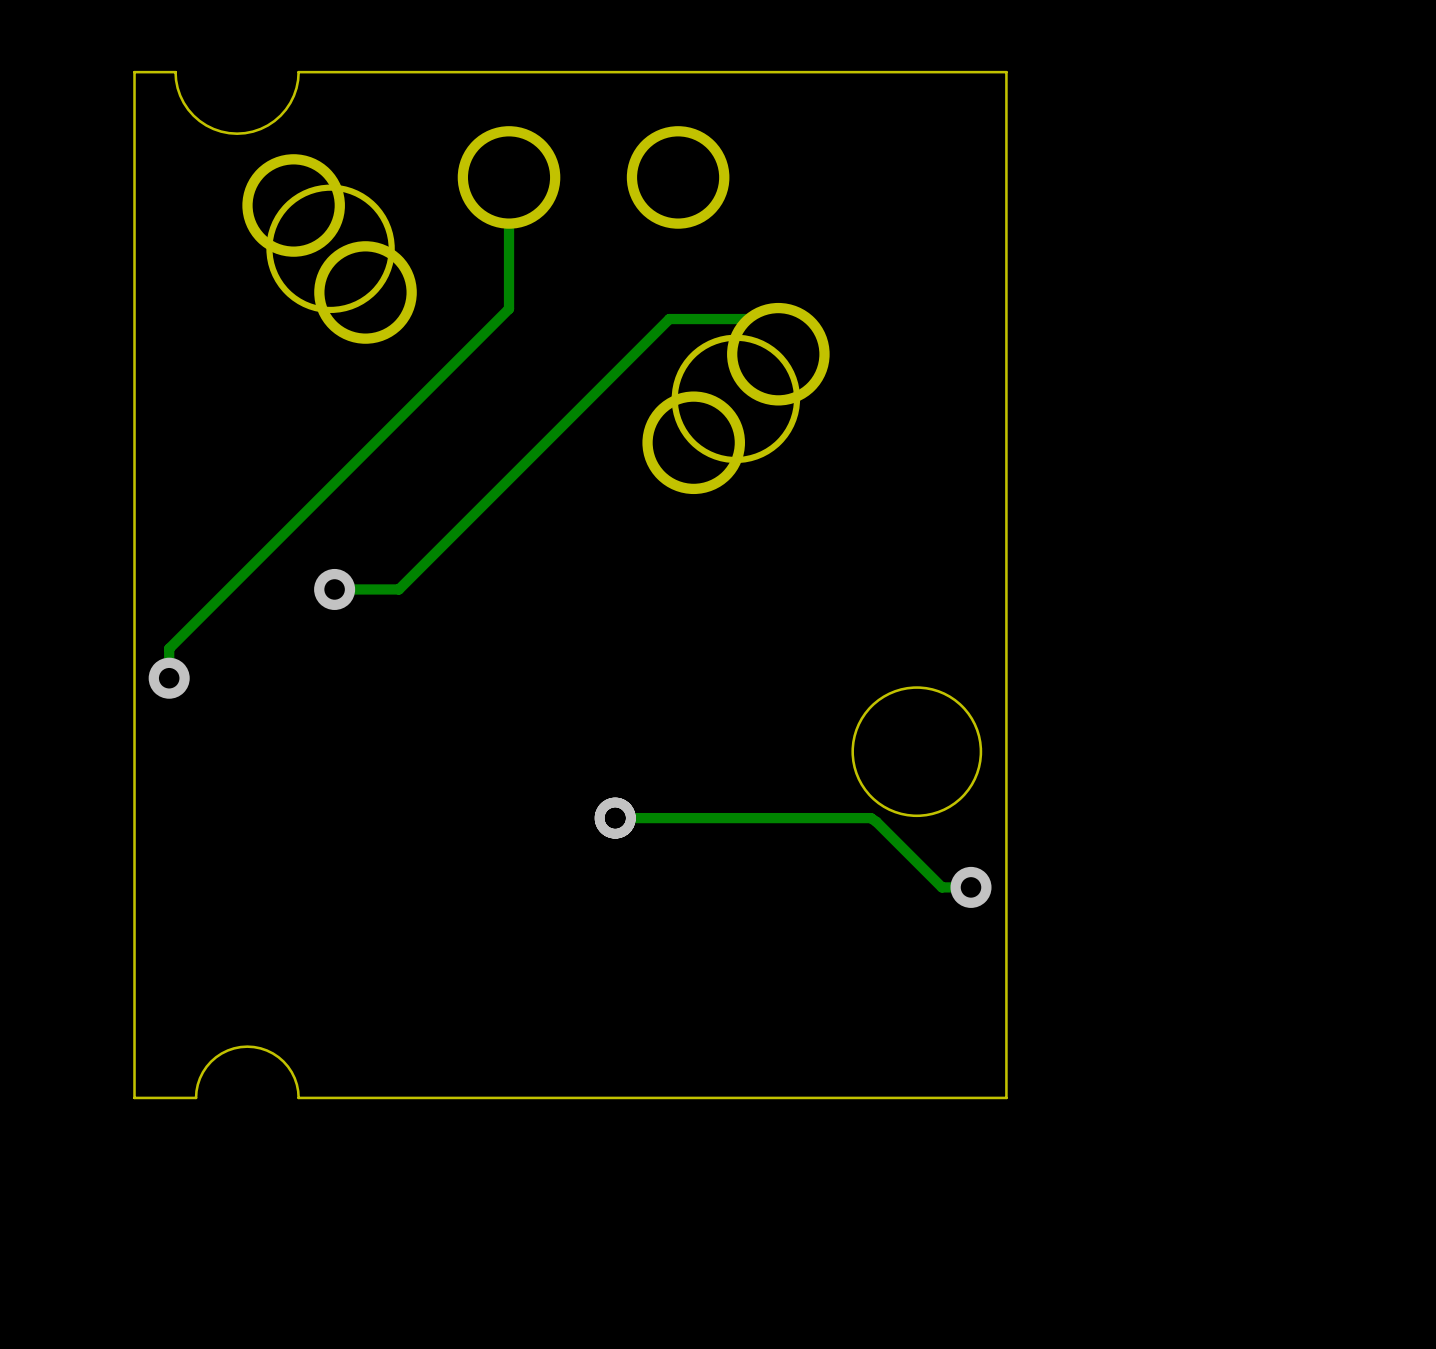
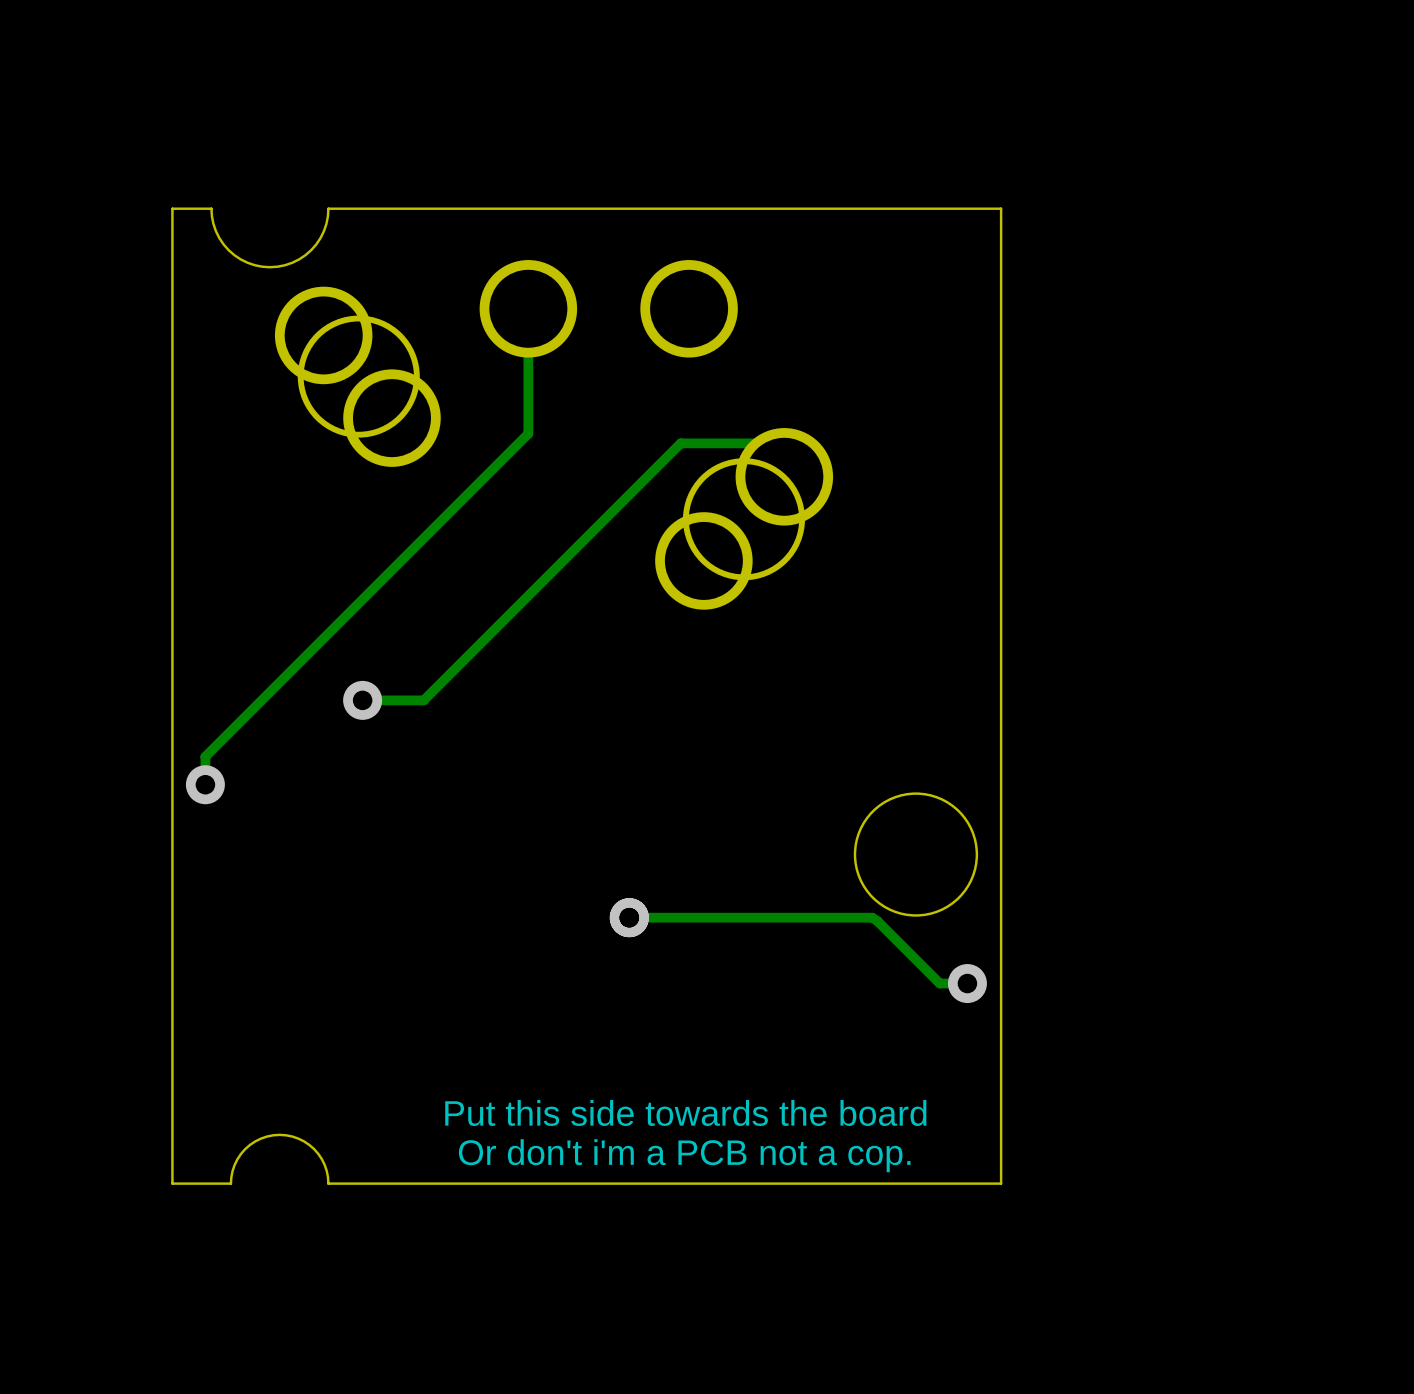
text: none -> Put this side towards the board (685, 1112)
text: none -> Or don't i'm a PCB not a cop. (684, 1155)

